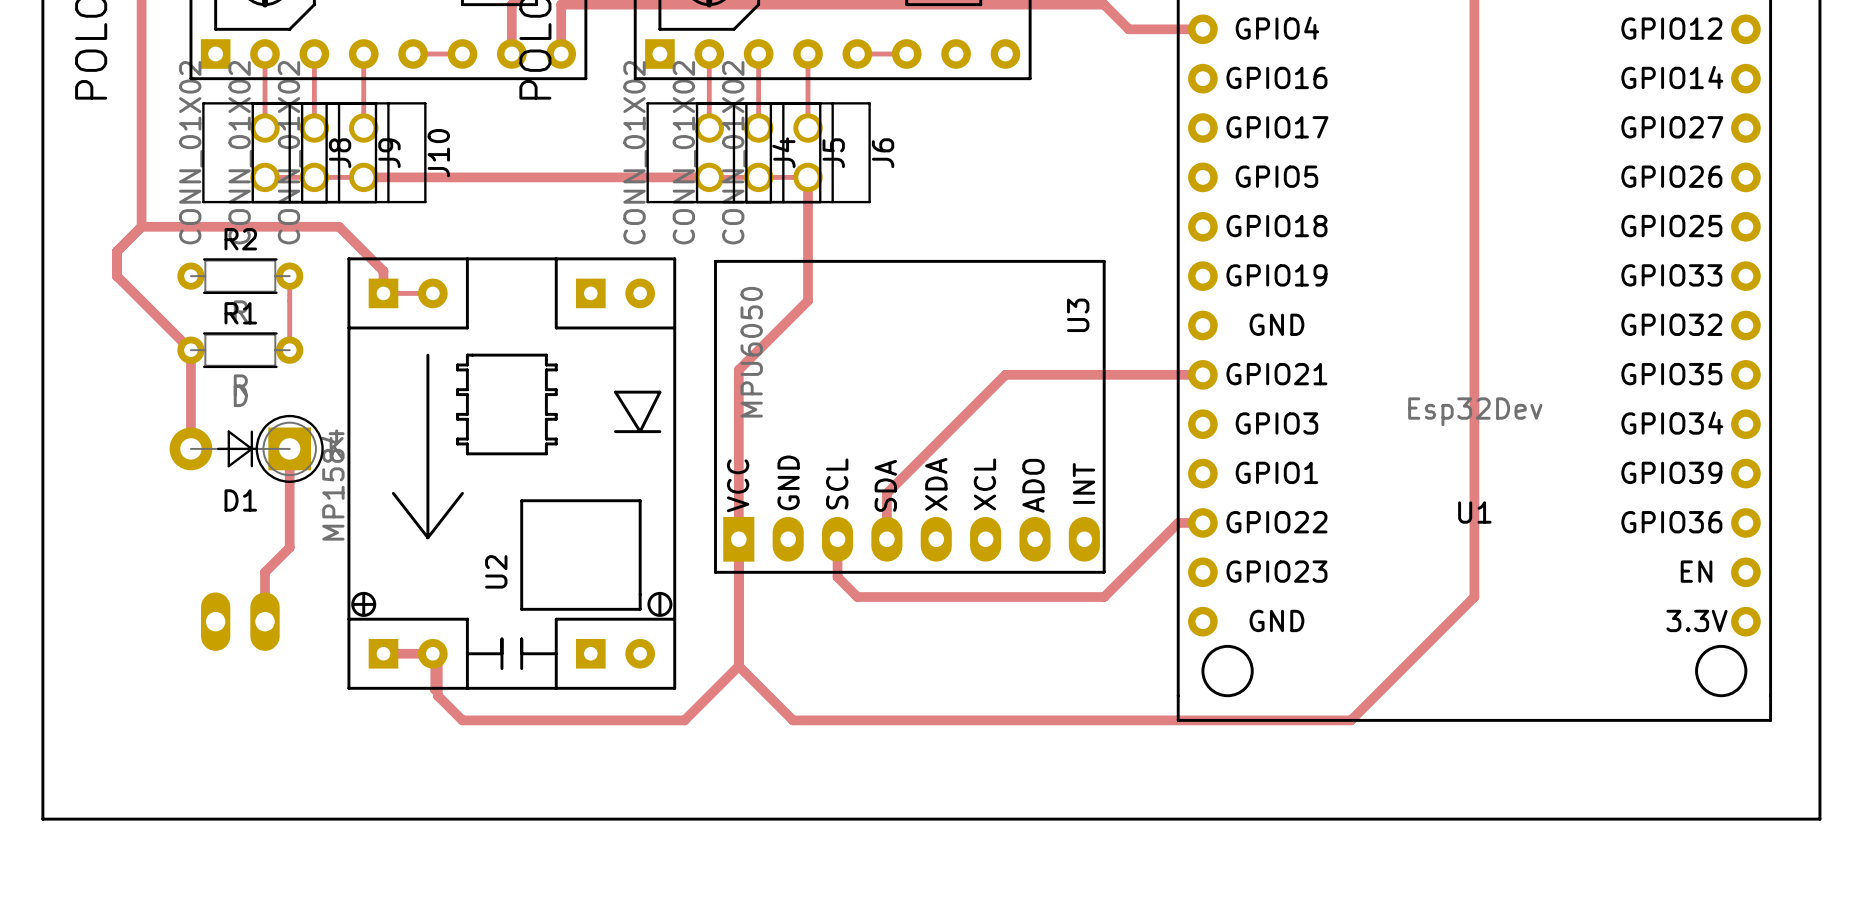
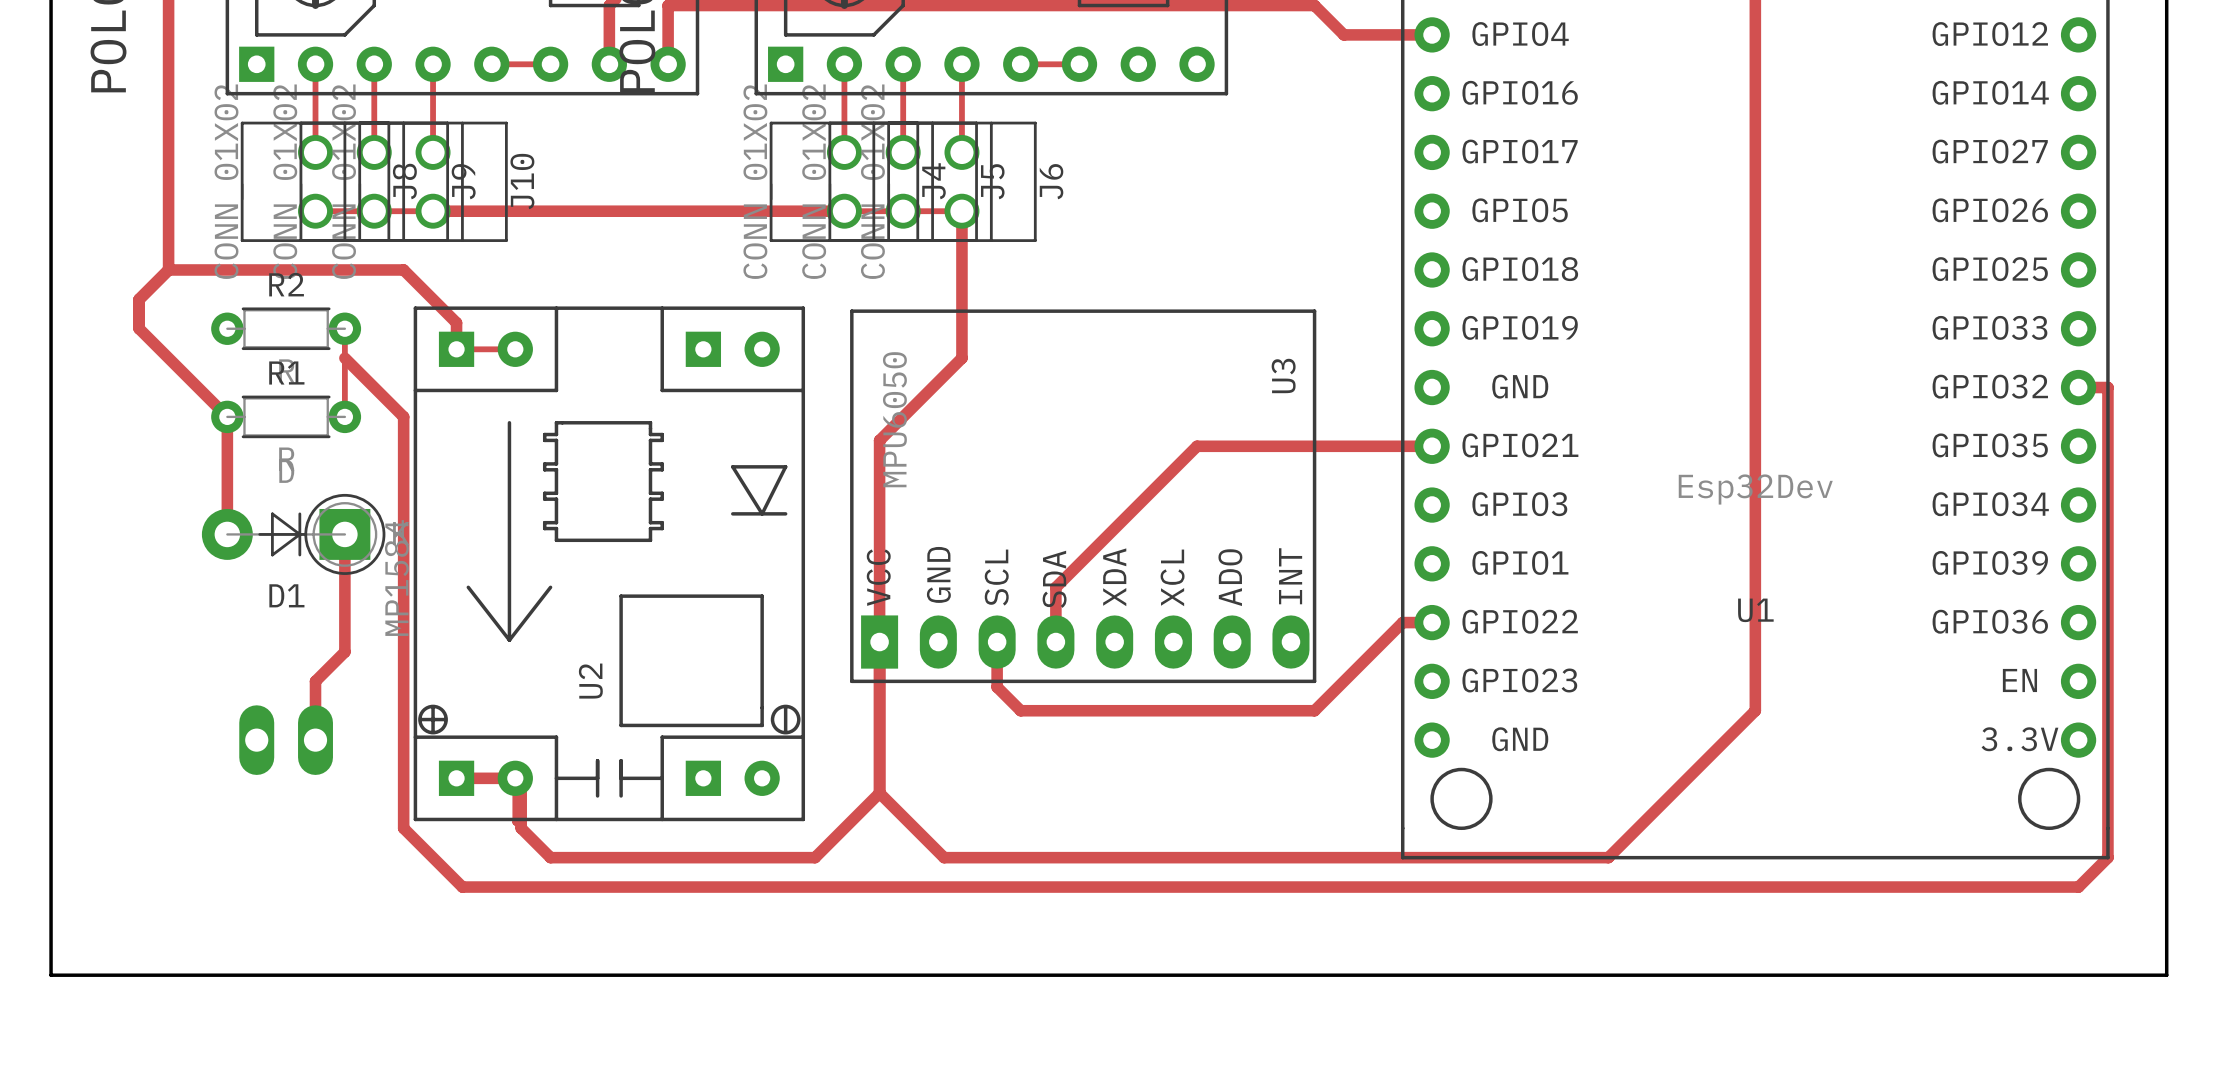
track: none -> (344, 358) (403, 416) (403, 828) (462, 887) (2078, 887) (2107, 857) (2107, 387) (2078, 387)

